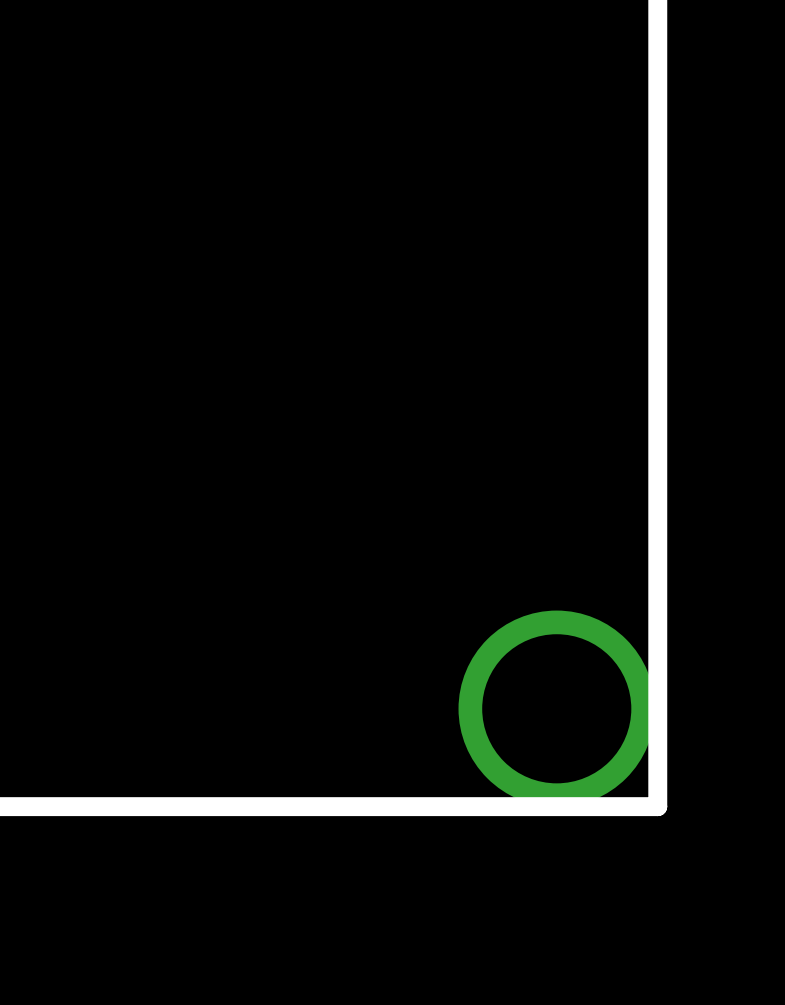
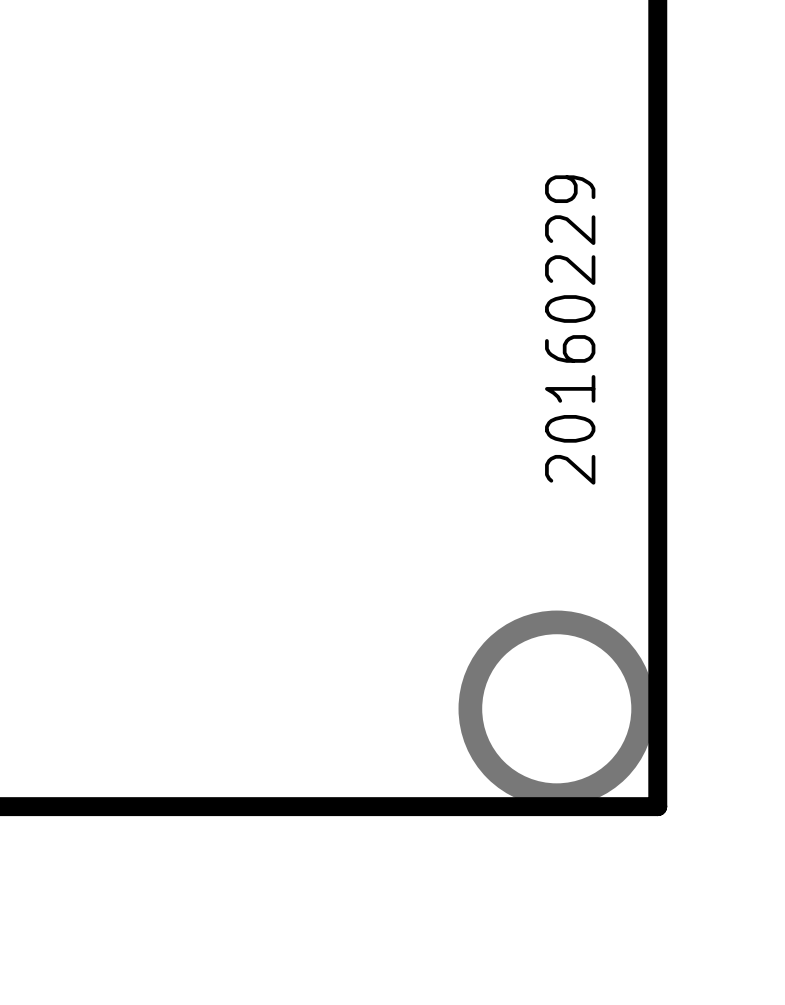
text: none -> 20160229 (570, 329)

